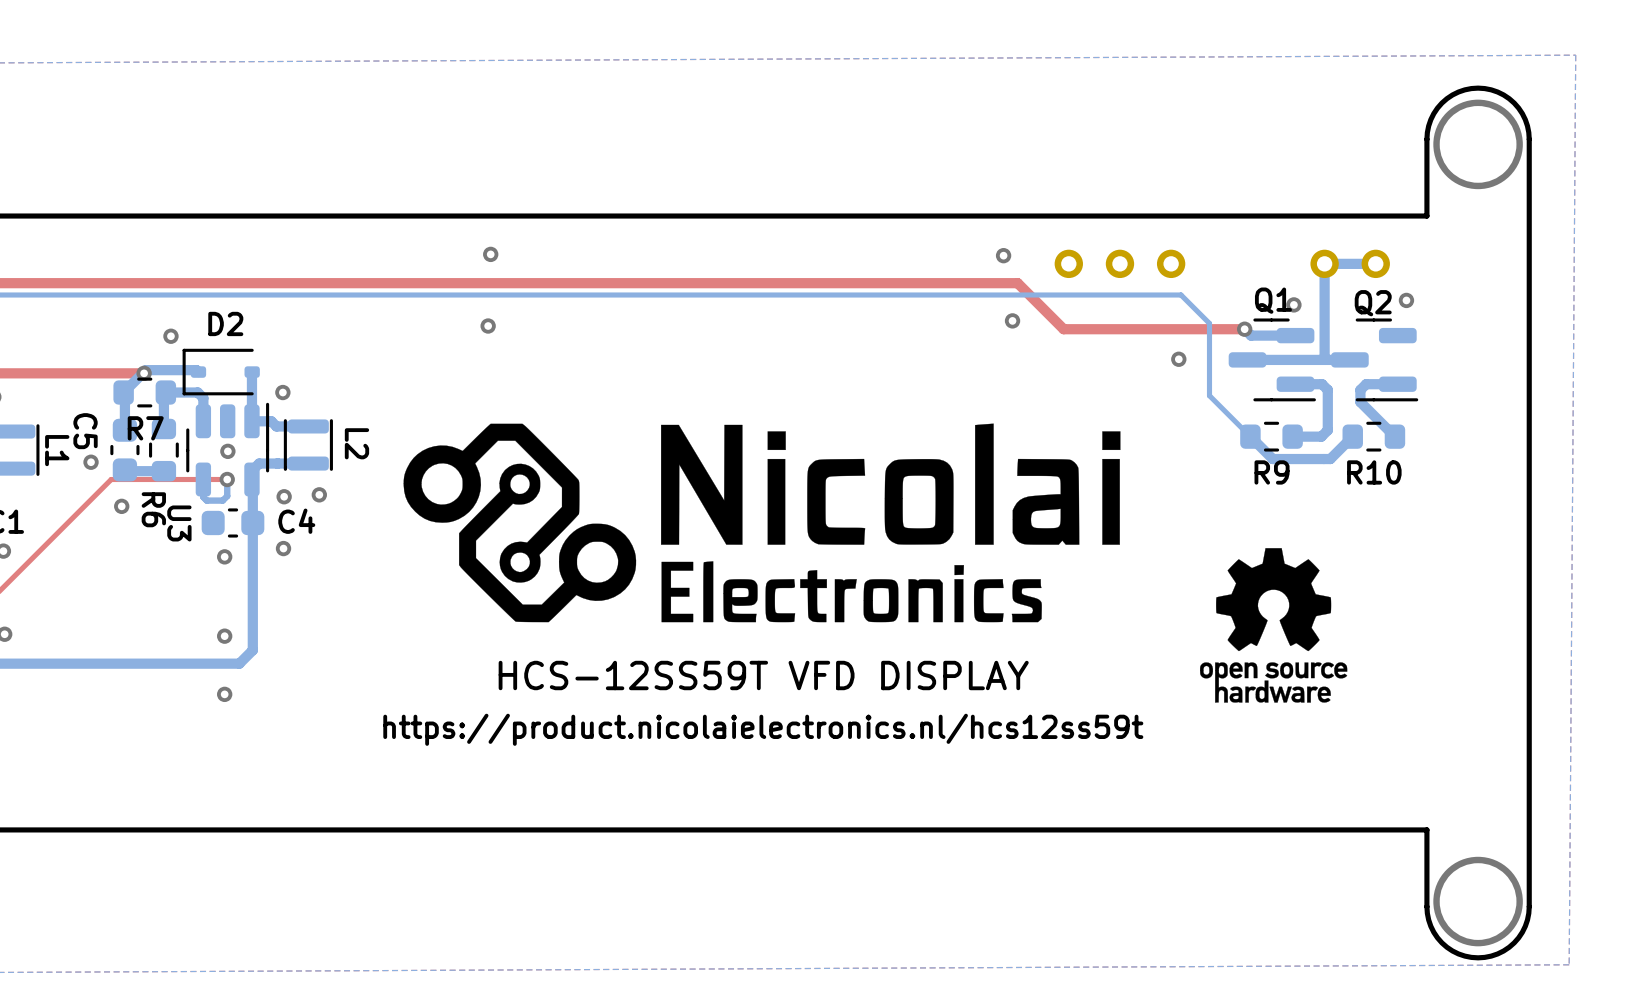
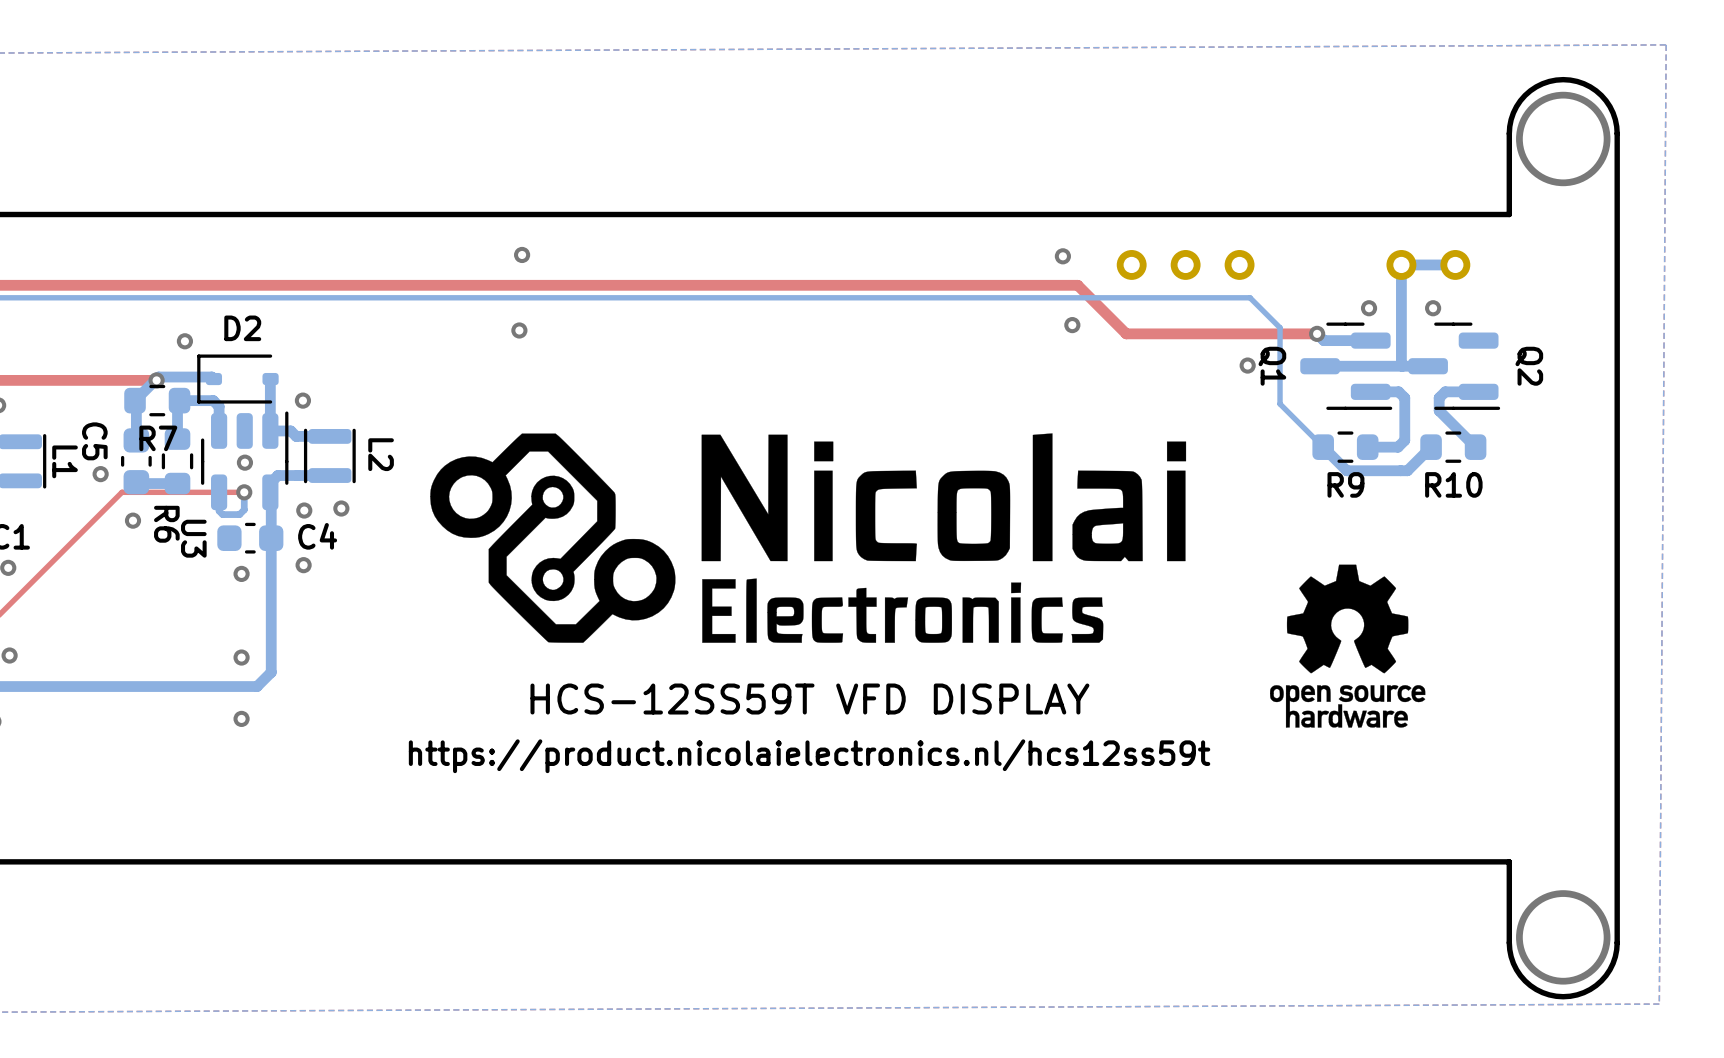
Q1 name rotation: 0° (1273, 300) -> 90° clockwise (1272, 366)
Q1 name position: Q1 (1273, 300) -> Q1 (1272, 366)
via position: (1406, 300) -> (1433, 308)
Q2 name rotation: 0° (1373, 303) -> 90° clockwise (1529, 366)
Q2 name position: Q2 (1373, 303) -> Q2 (1529, 366)

